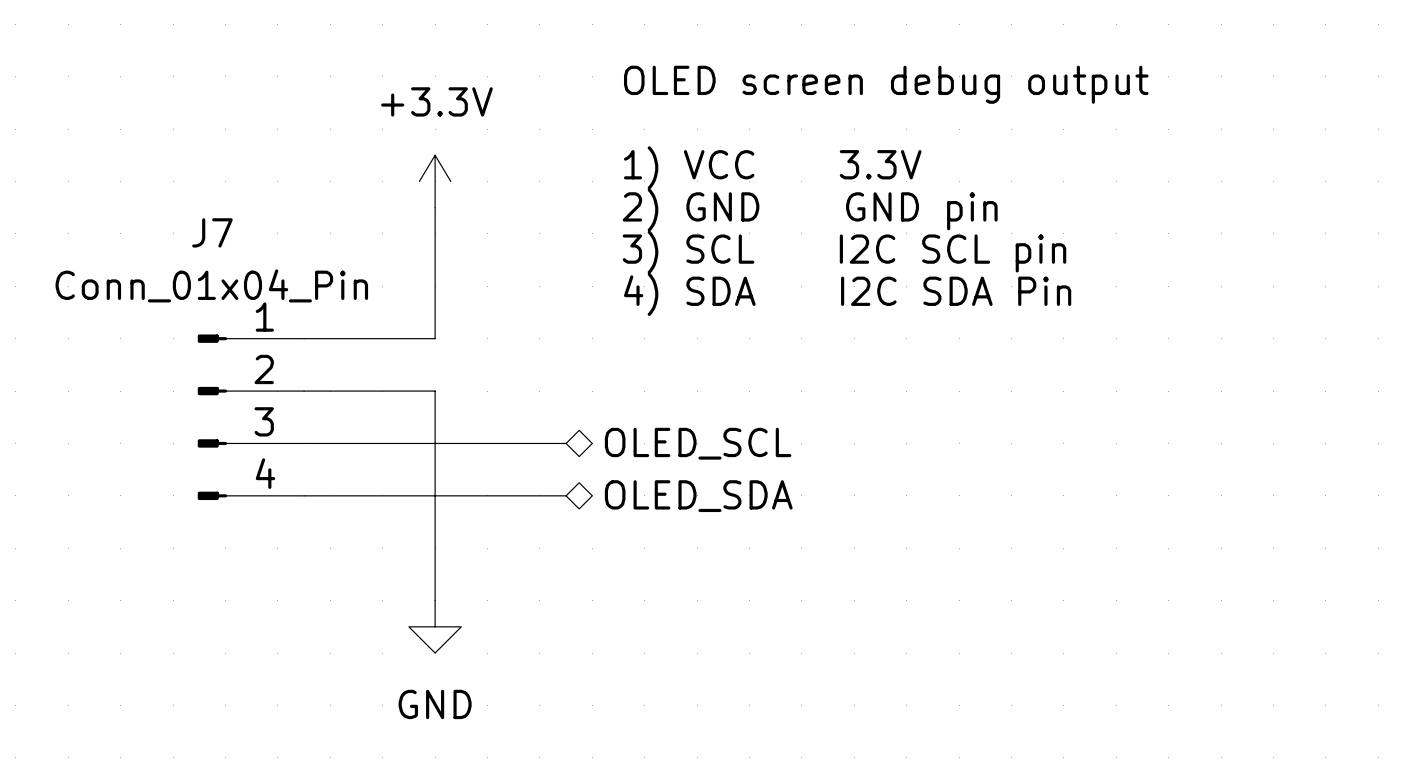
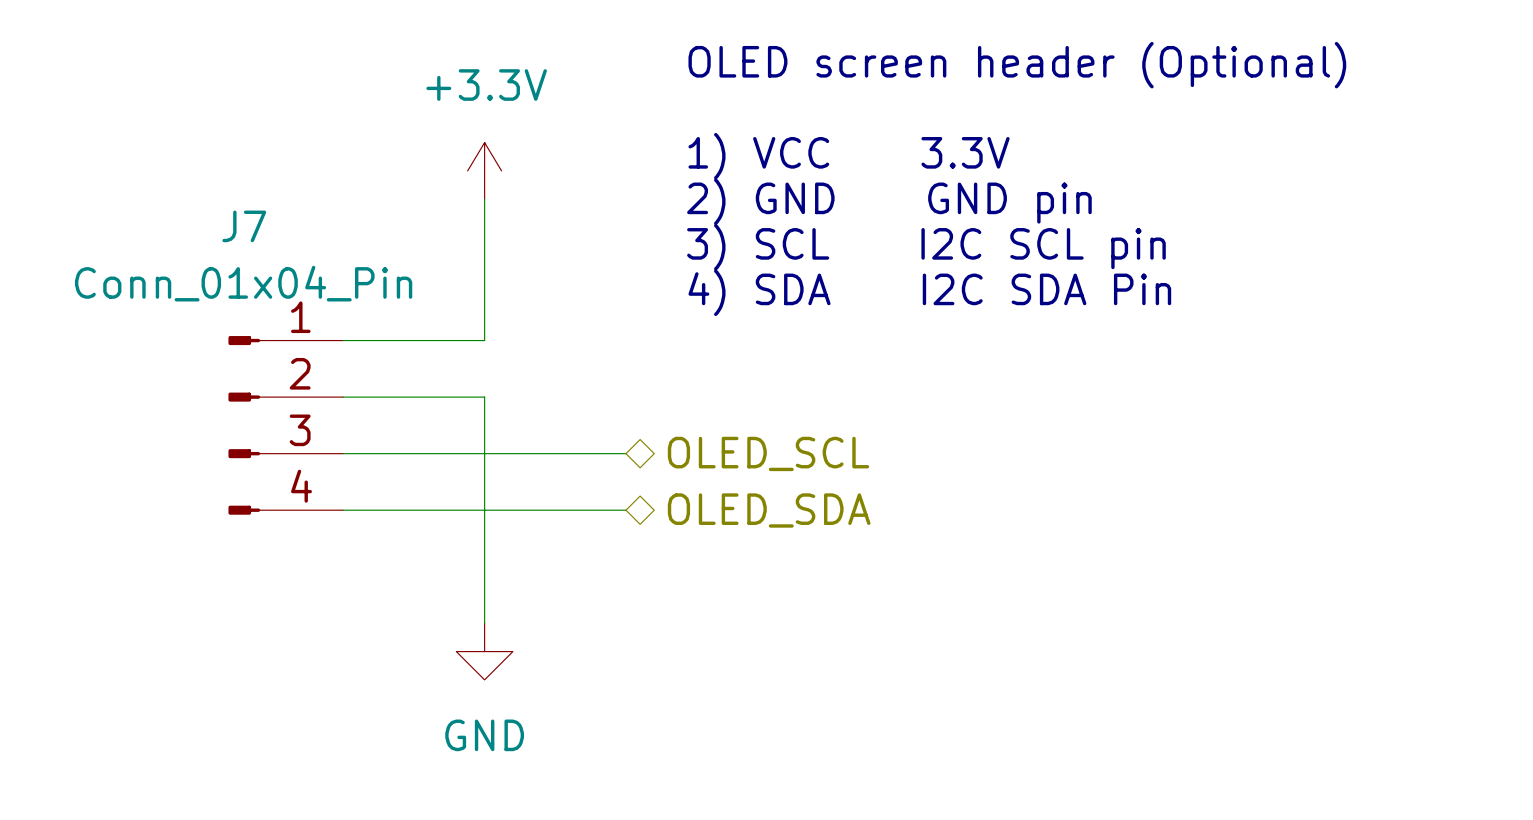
text: OLED screen debug output (886, 84) -> OLED screen header (Optional) (1017, 65)

